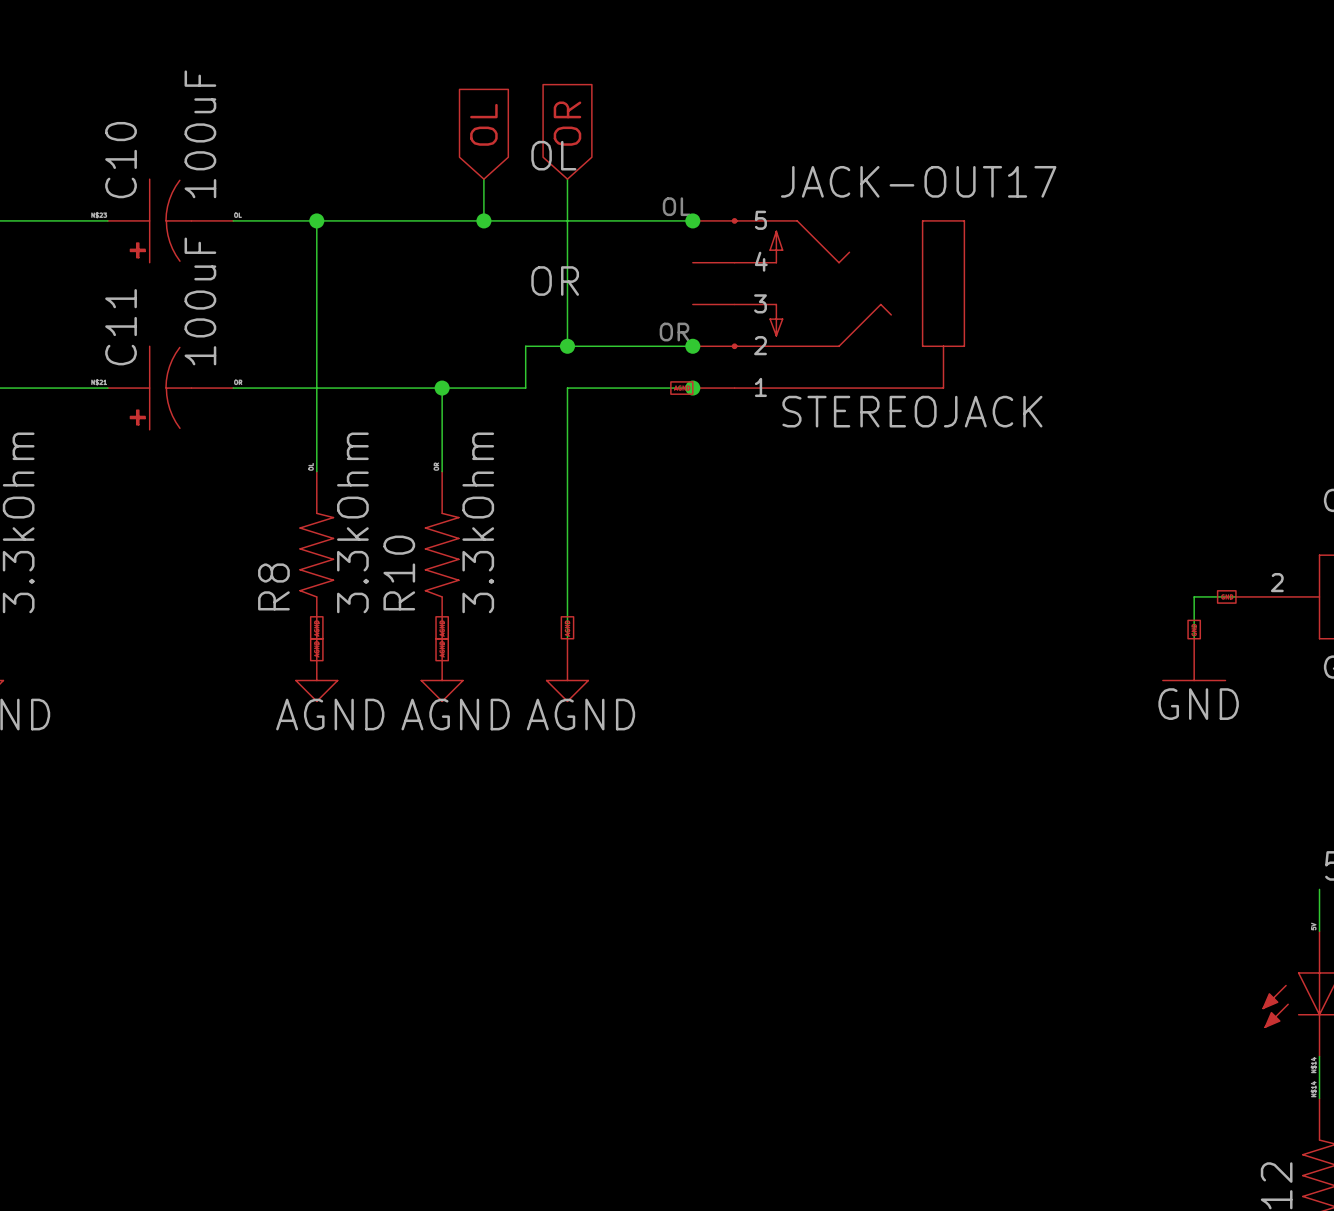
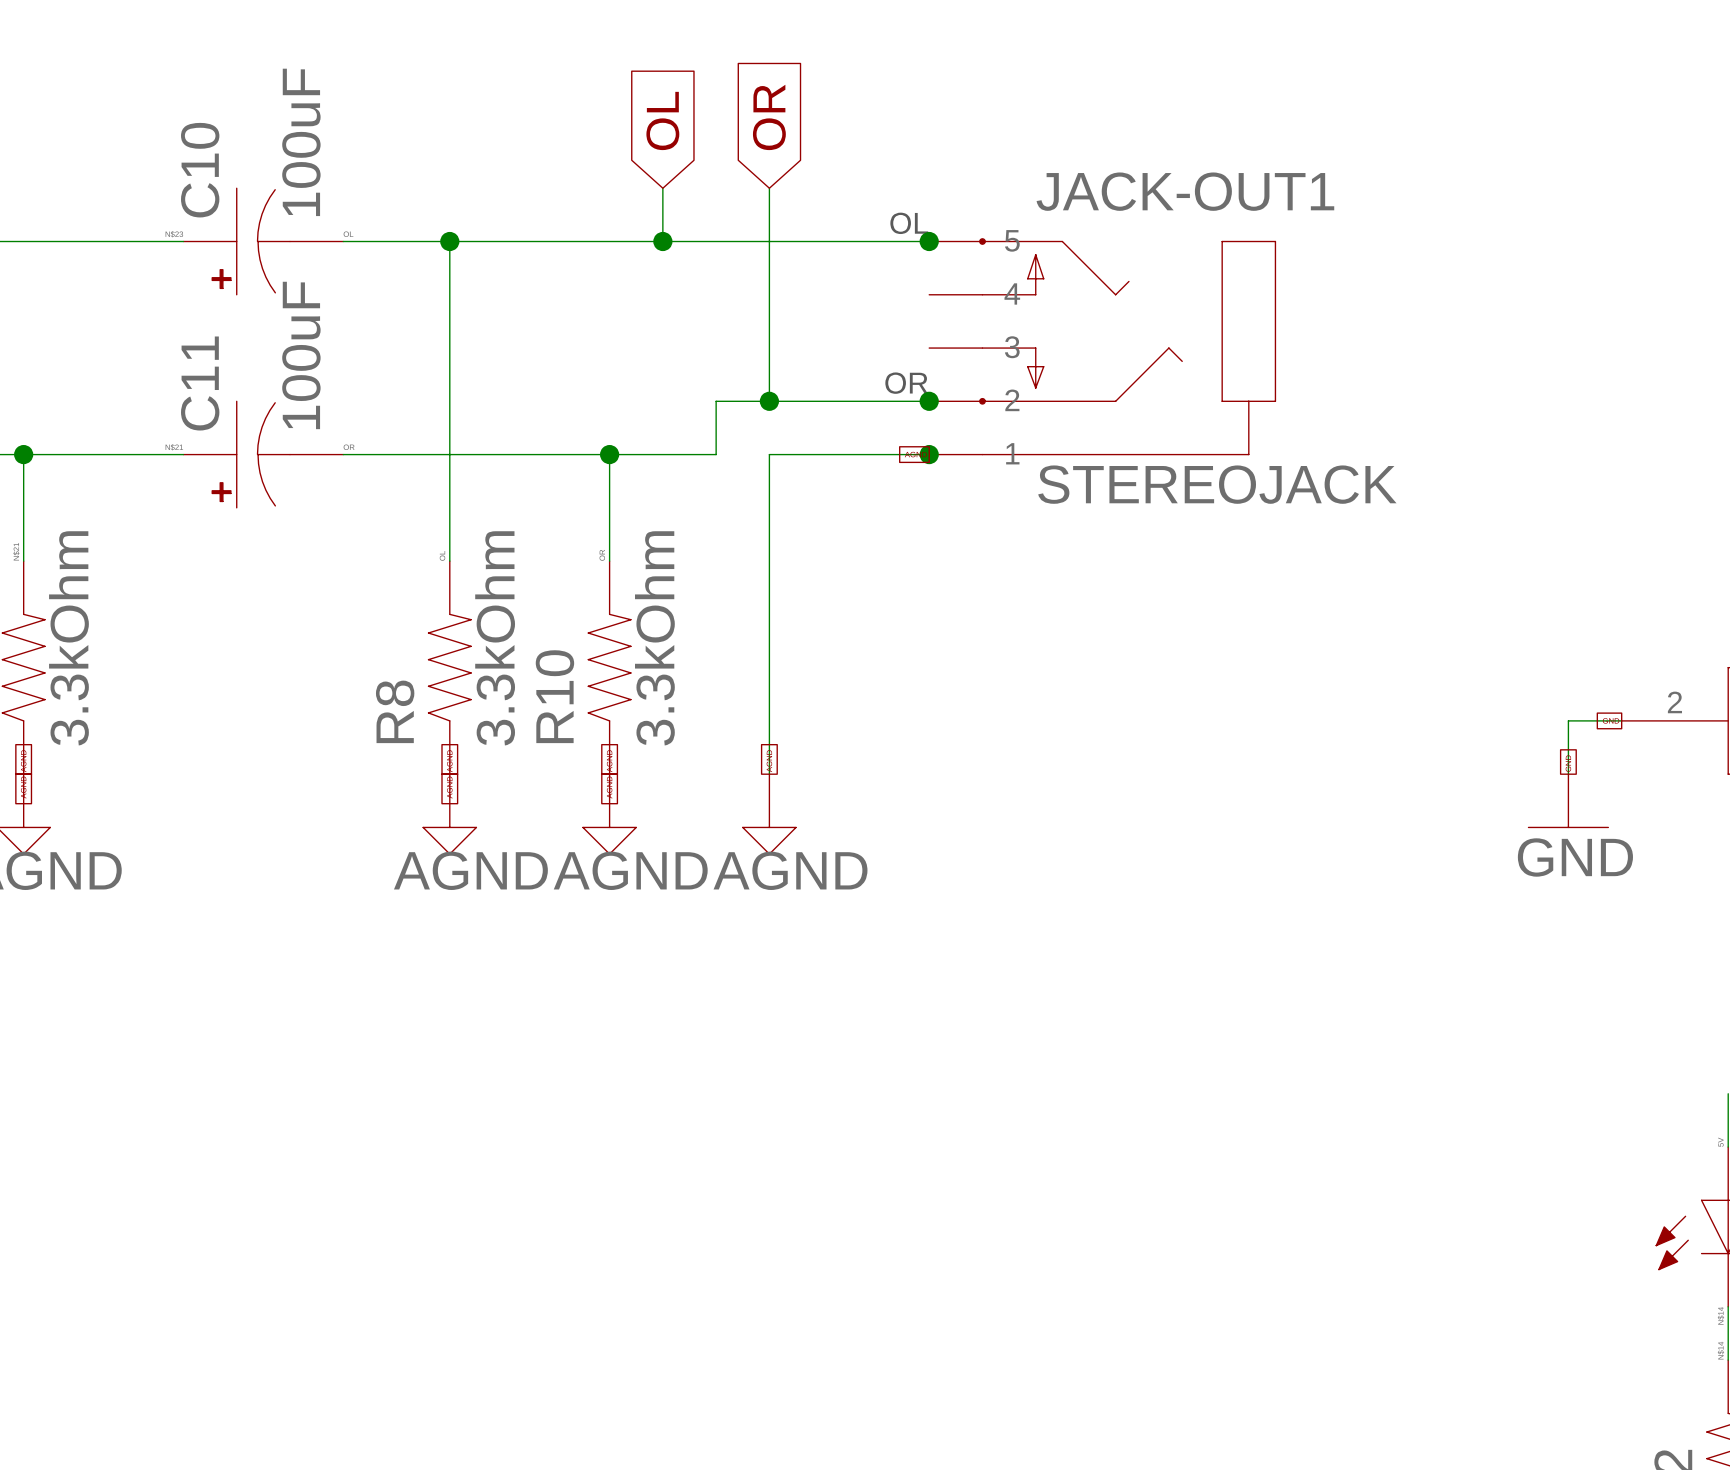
label: OL (553, 155) -> none
JACK-OUT17 name: JACK-OUT17 (918, 181) -> JACK-OUT1 (1185, 191)
label: OR (555, 281) -> none

